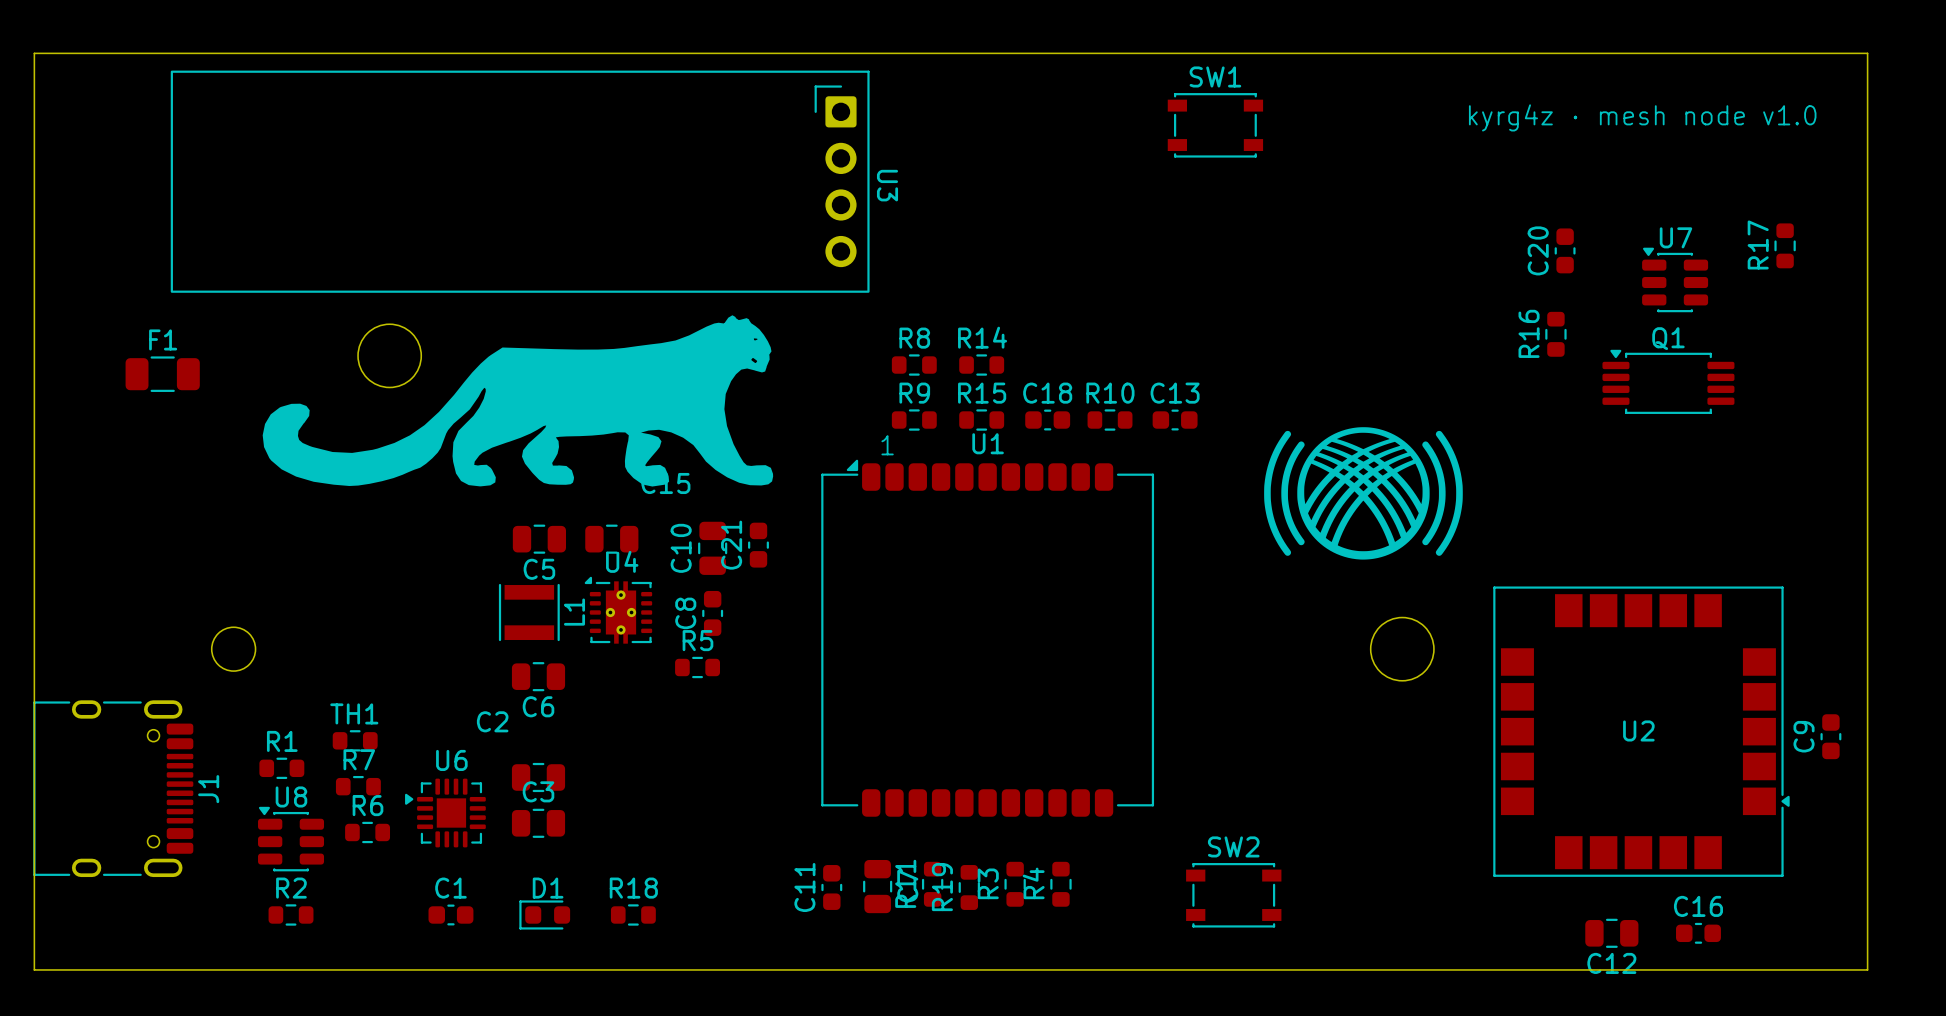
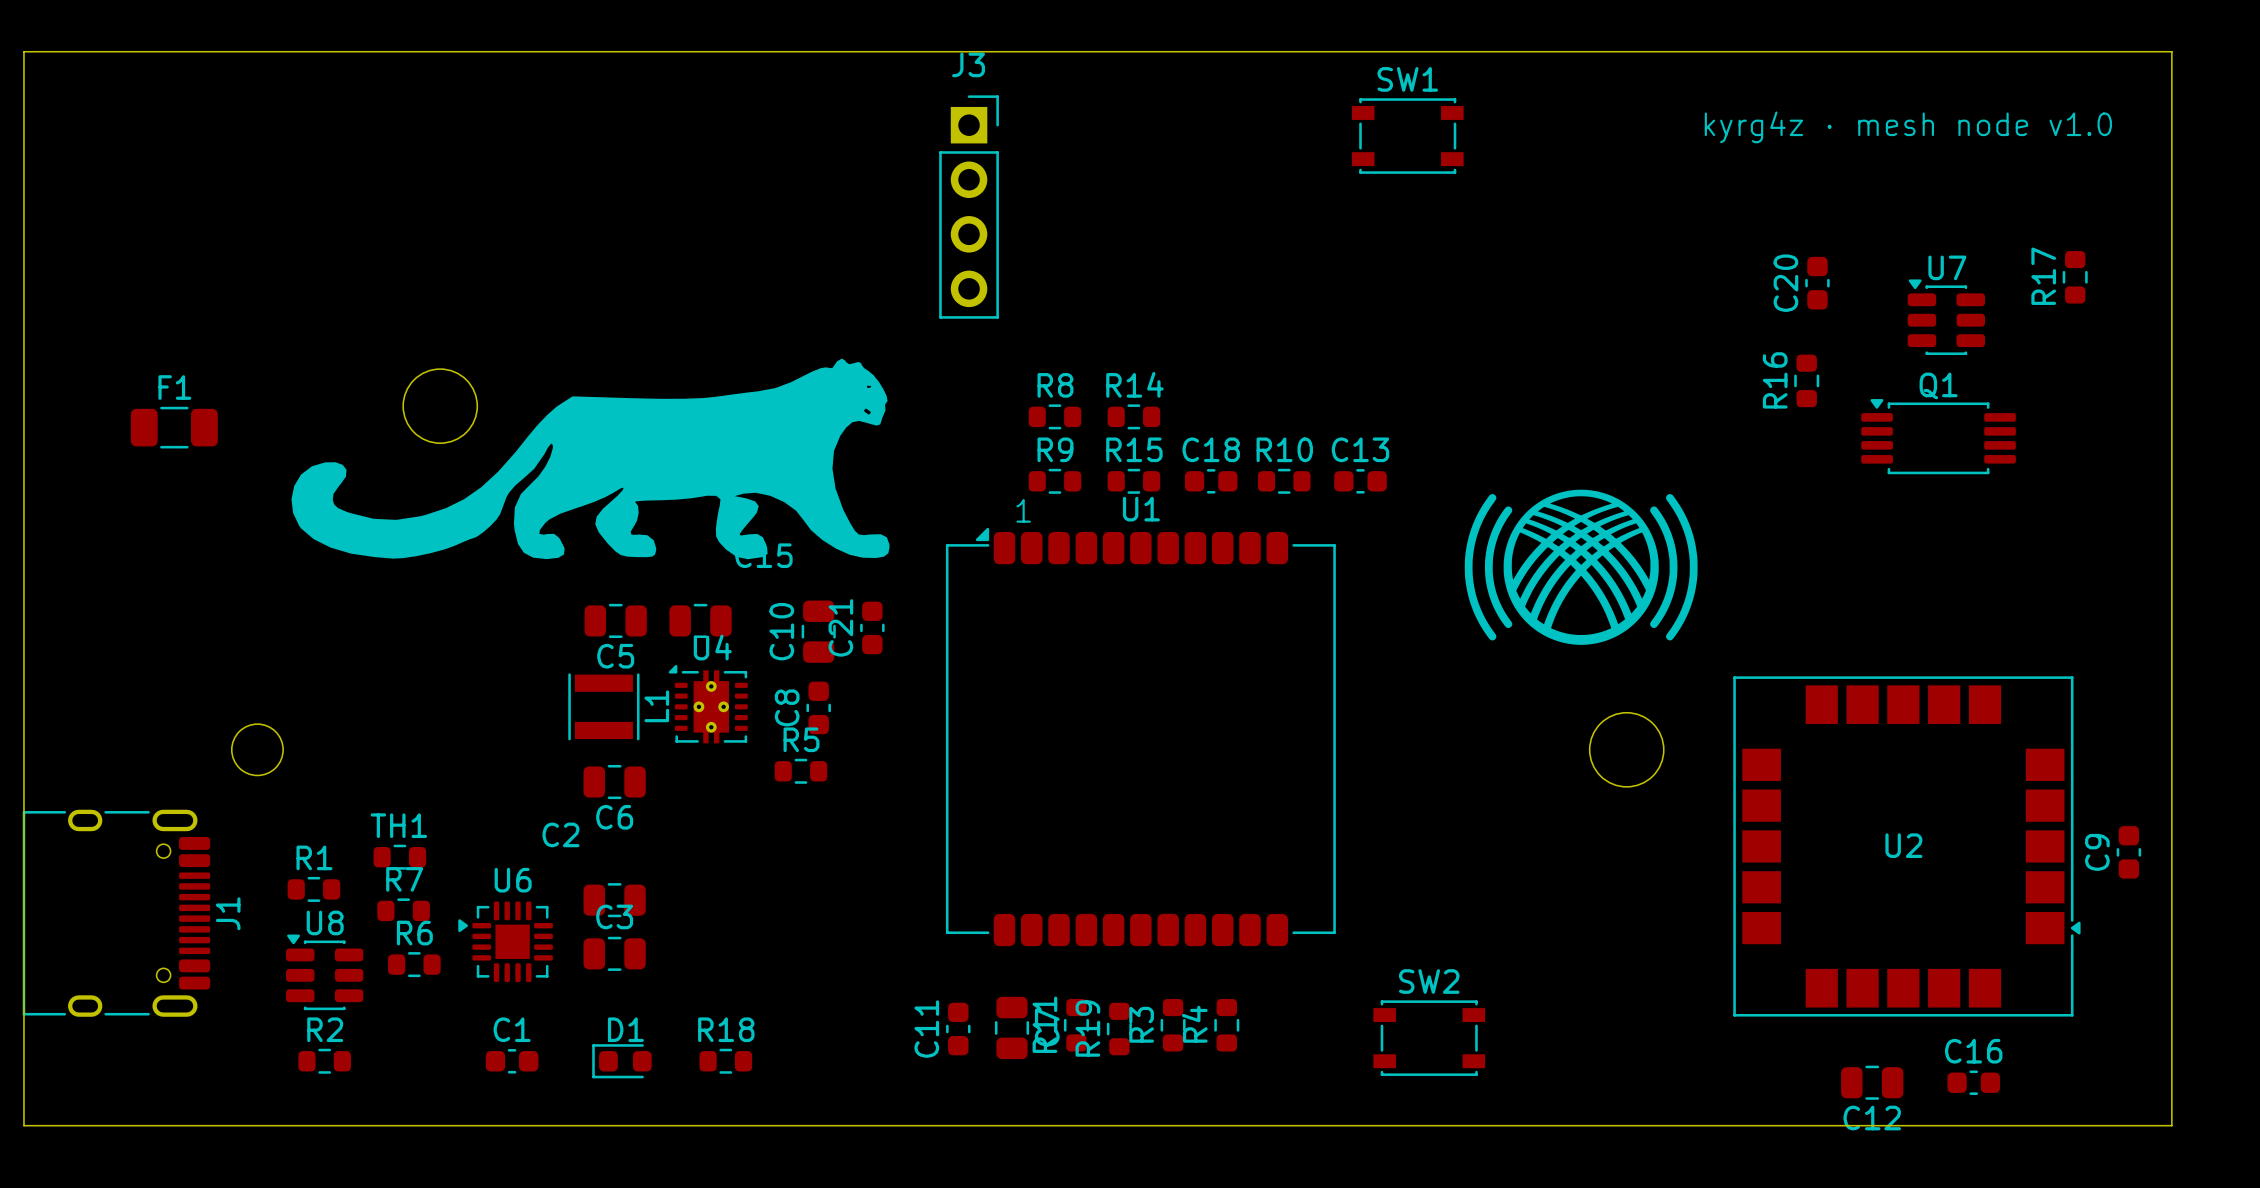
U3: (520, 181) -> none
J3: none -> (969, 207)

